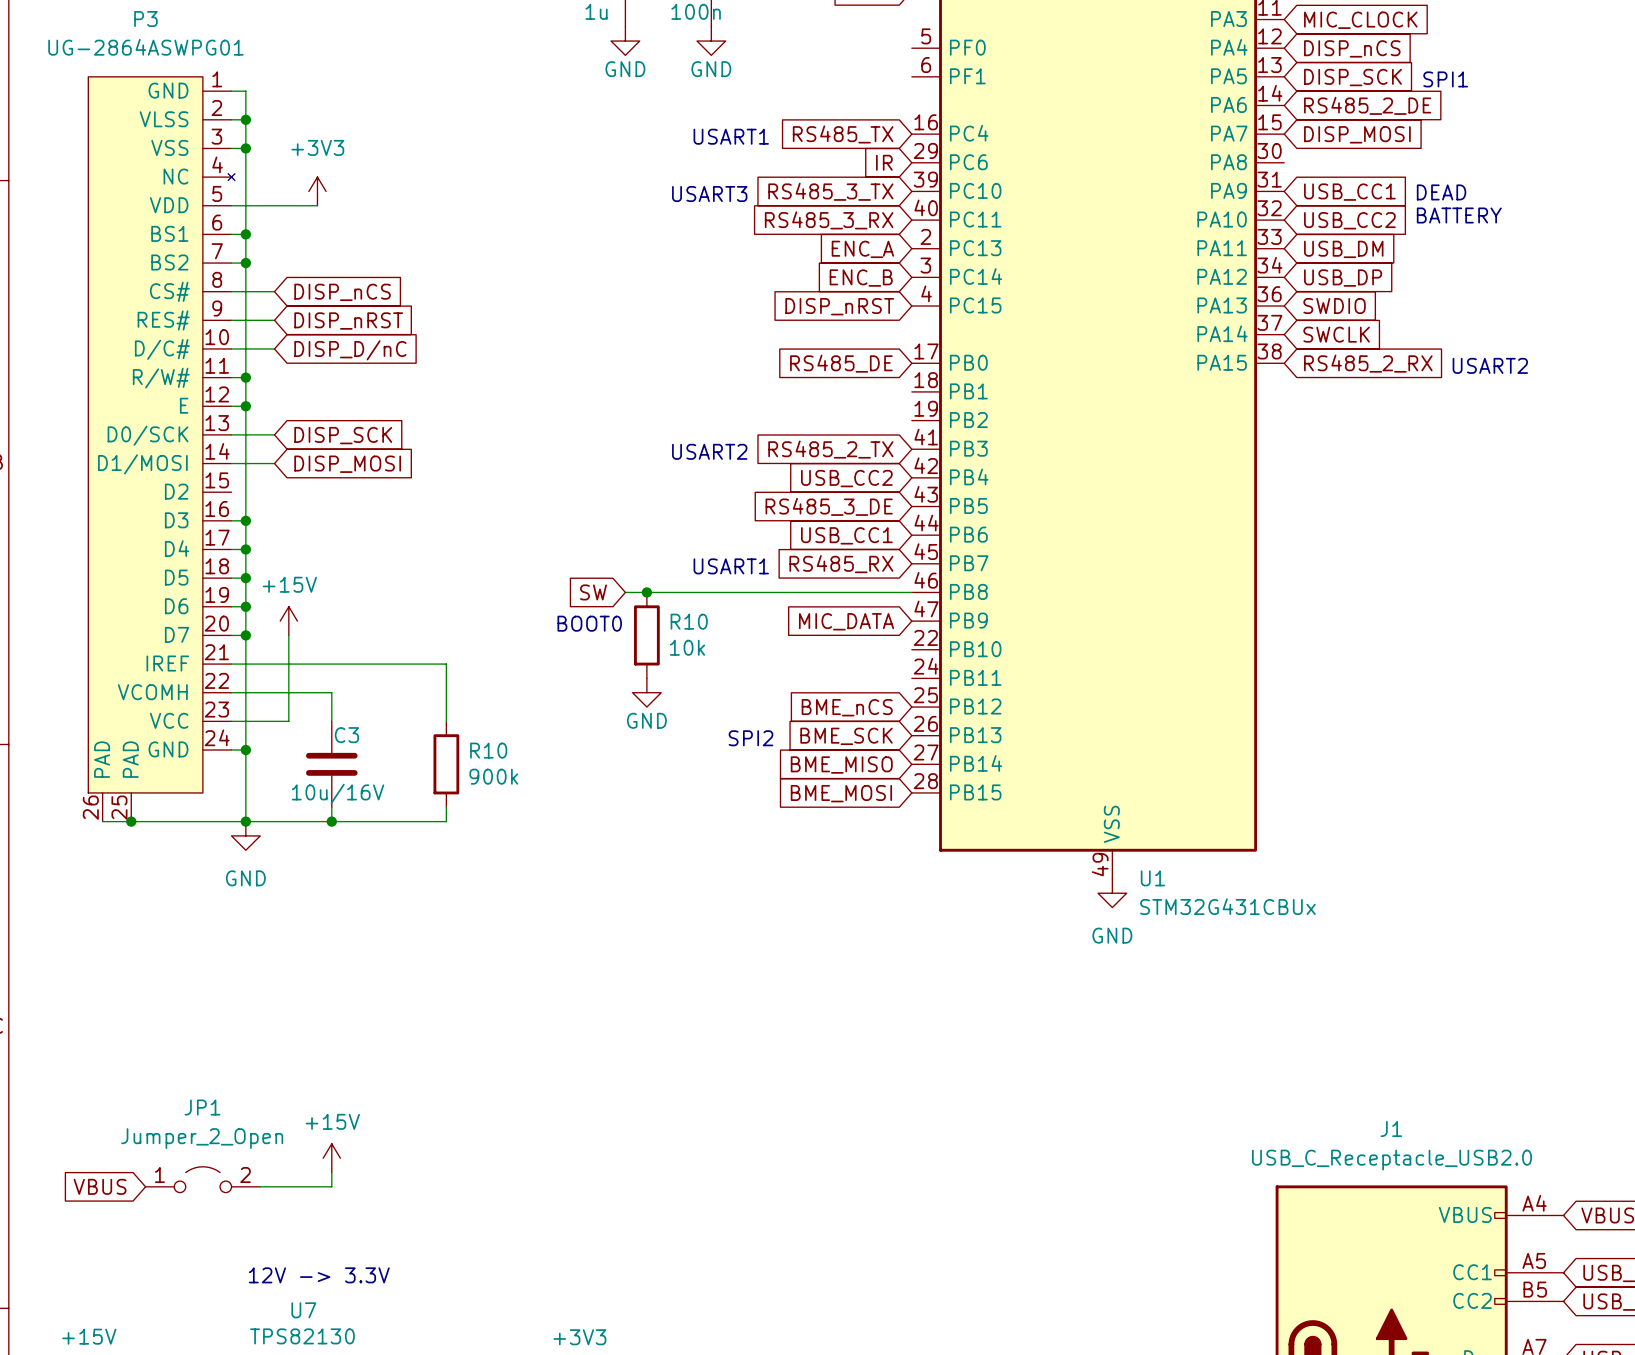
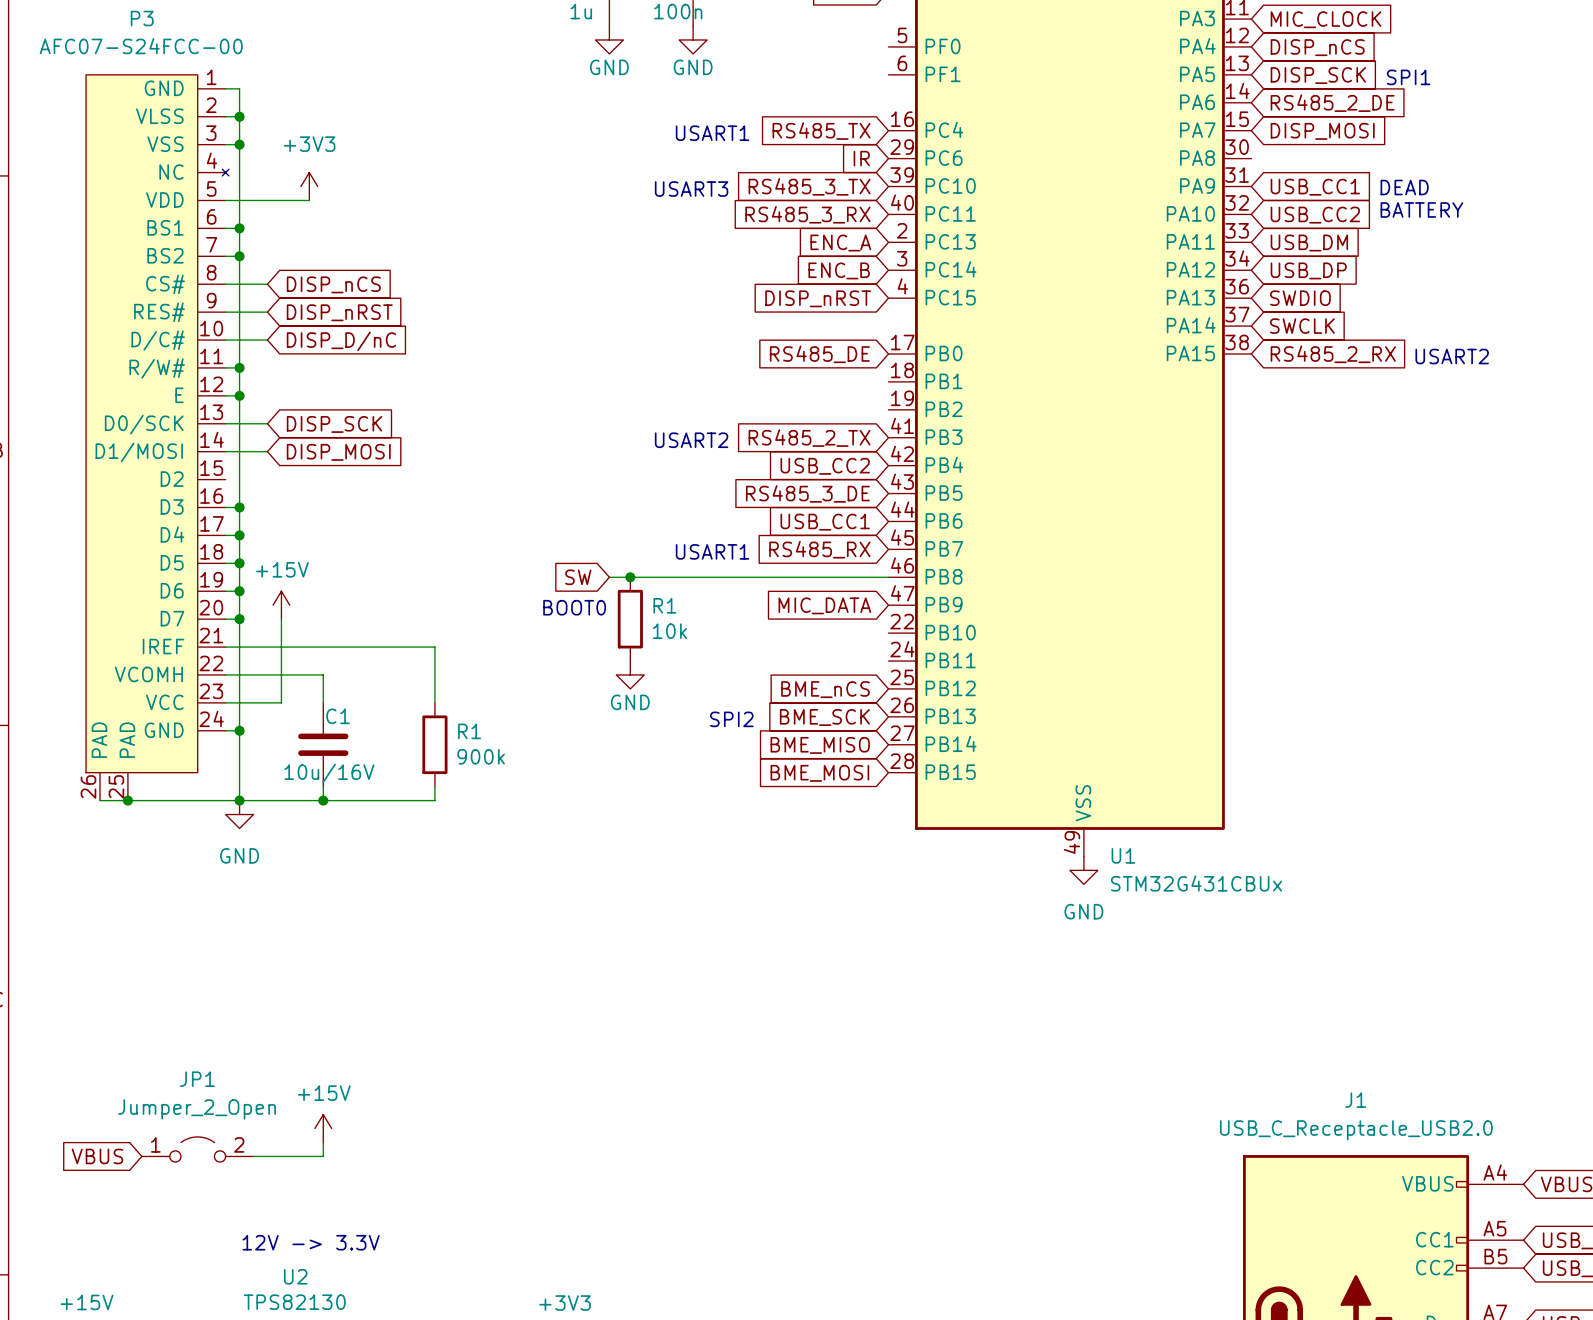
P3 value: UG-2864ASWPG01 (145, 47) -> AFC07-S24FCC-00 (141, 46)
R10 name: R10 (689, 621) -> R1 (664, 605)
C3 name: C3 (346, 735) -> C1 (338, 716)
R10 name: R10 (488, 750) -> R1 (469, 731)
U7 name: U7 (303, 1310) -> U2 (295, 1276)

